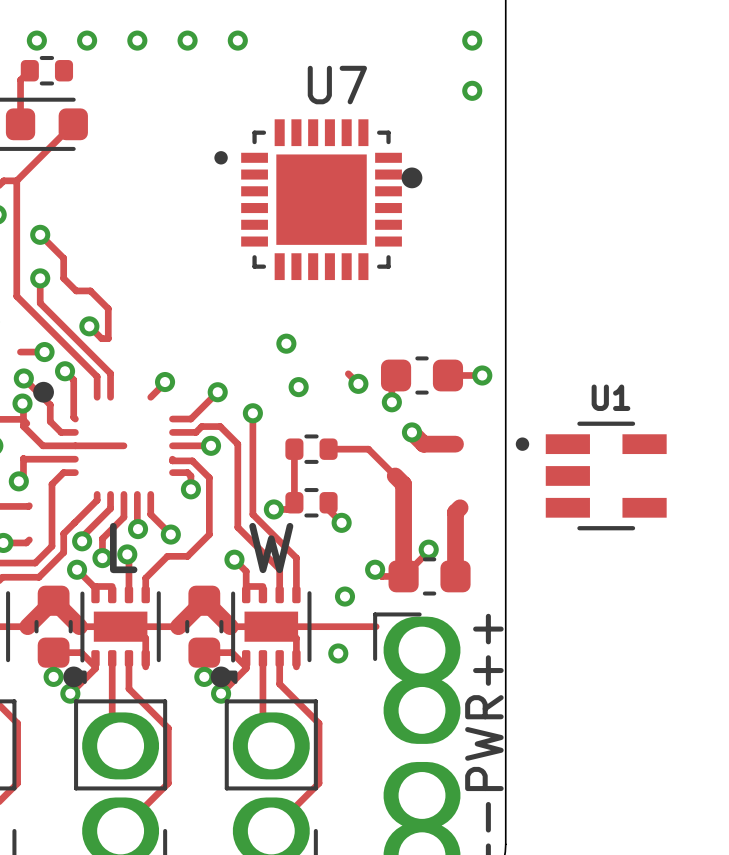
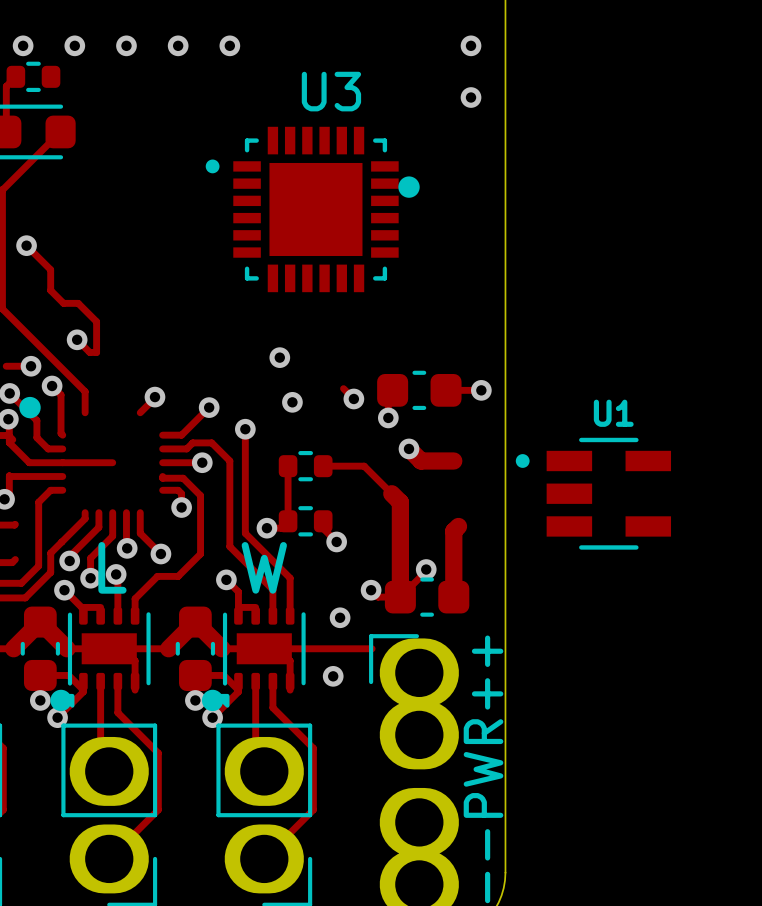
U7 name: U7 (337, 85) -> U3 (331, 91)
track: (40, 278) (40, 303) (110, 373) (110, 397) -> none
via: (40, 278) -> none

